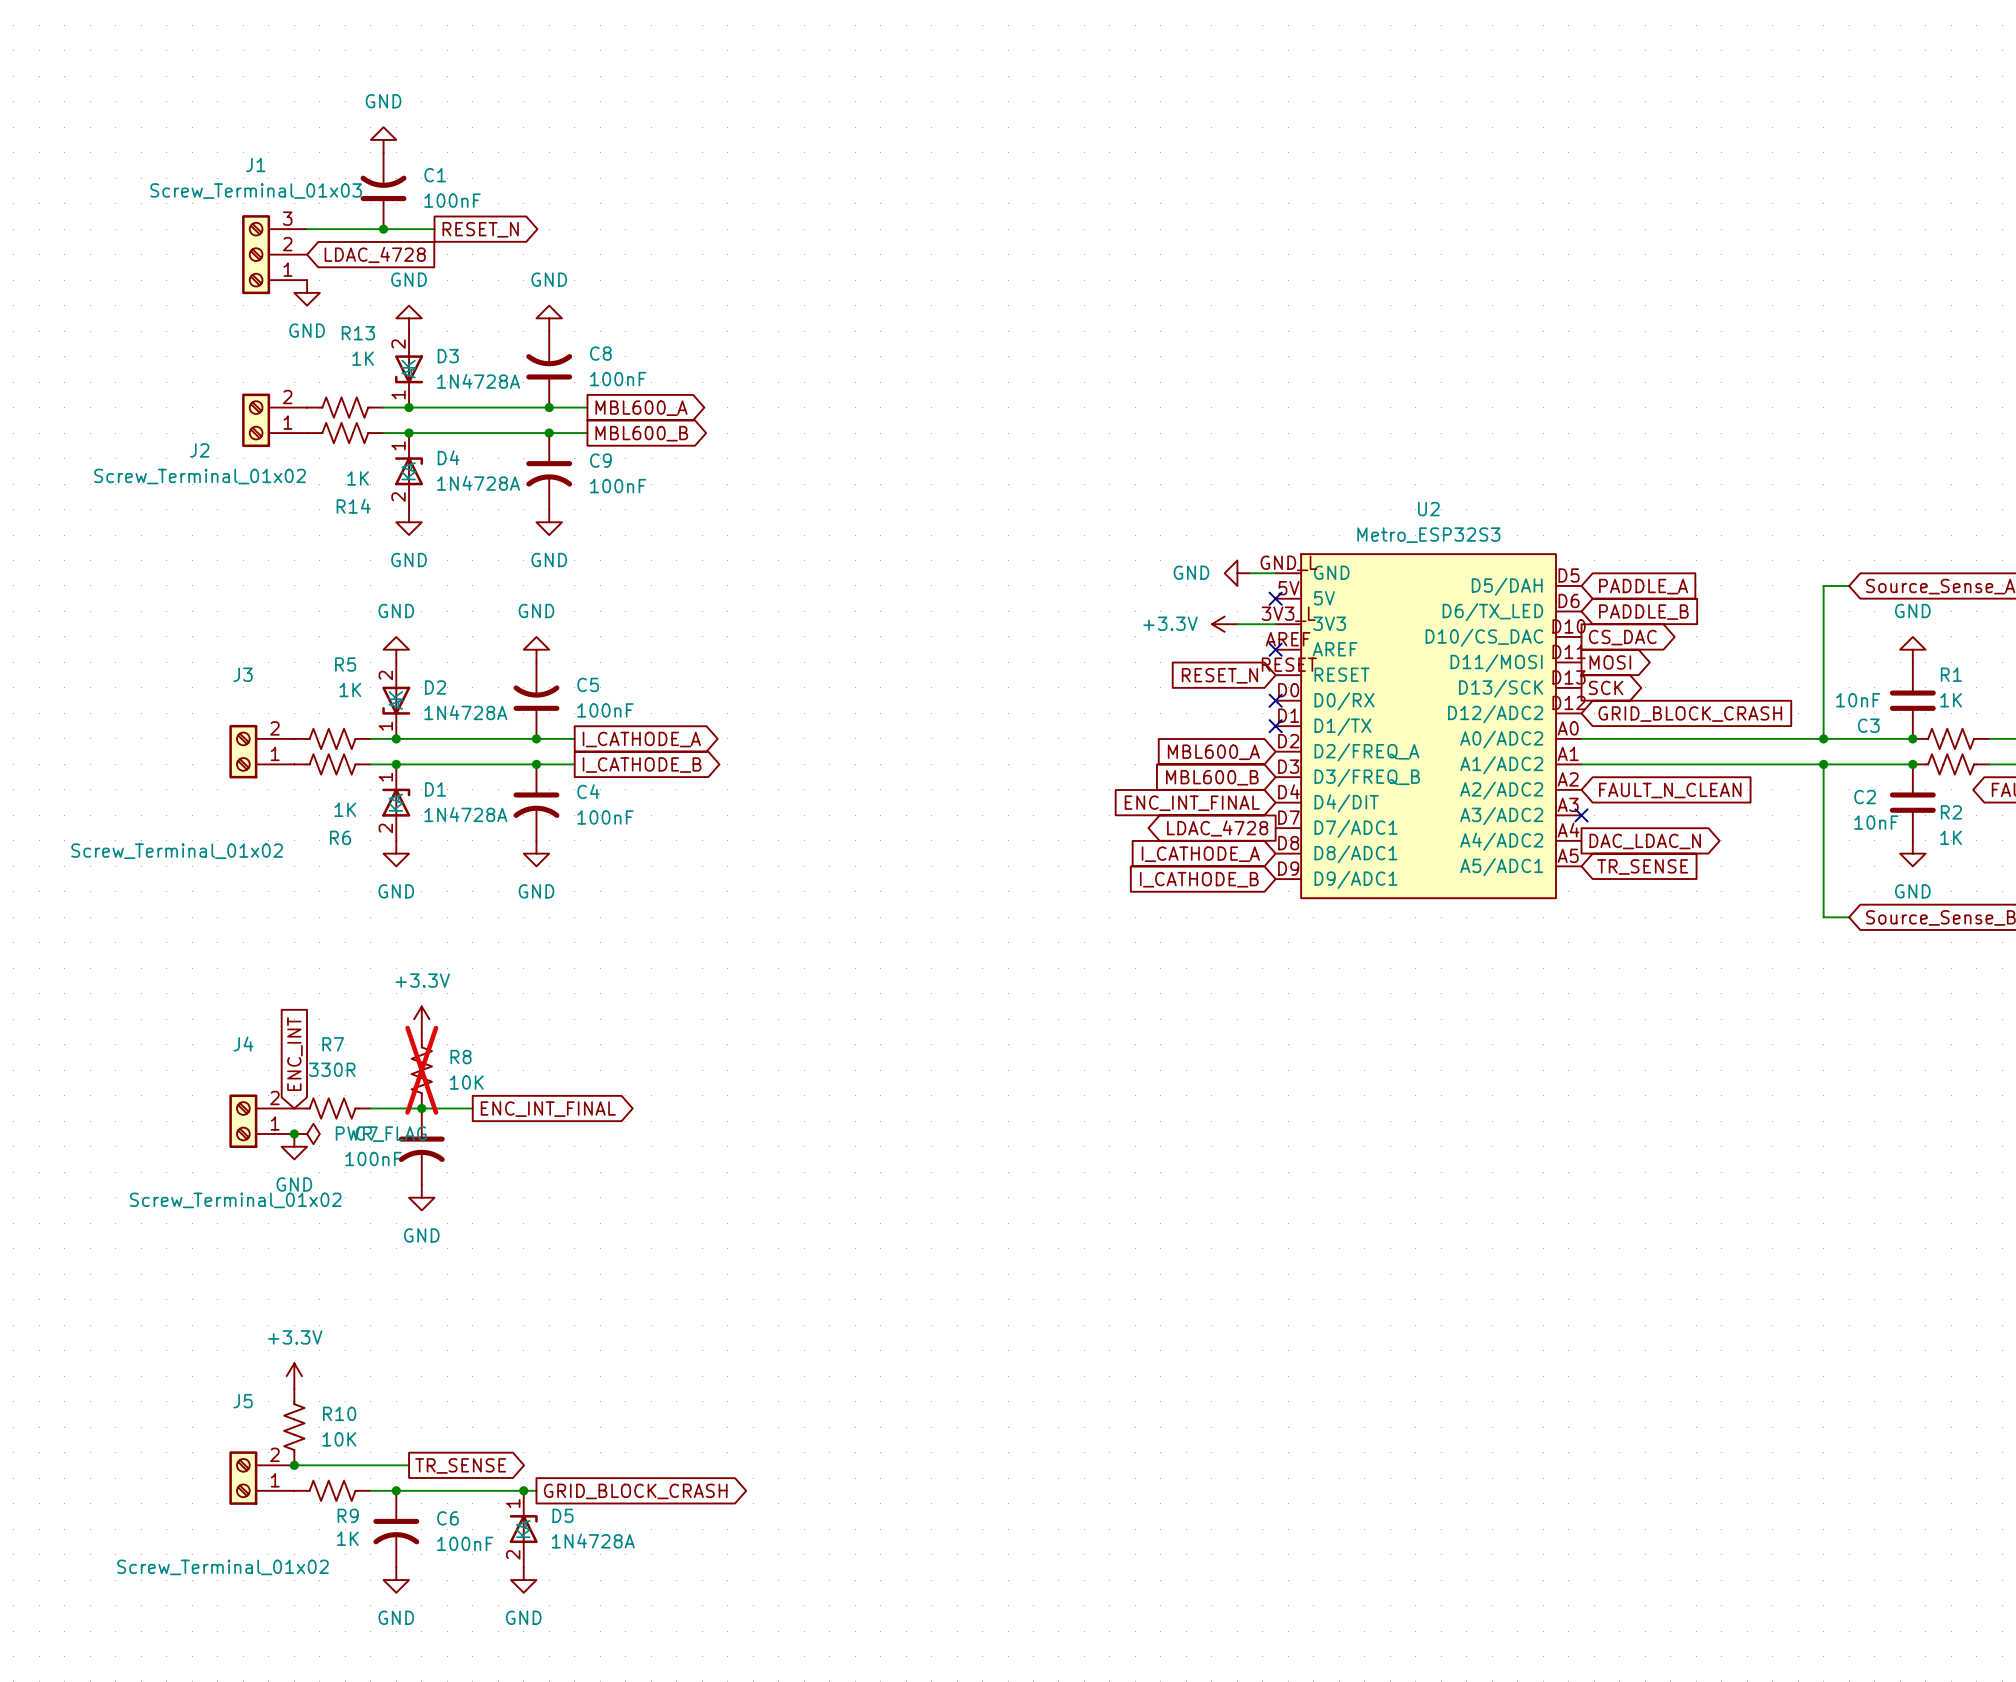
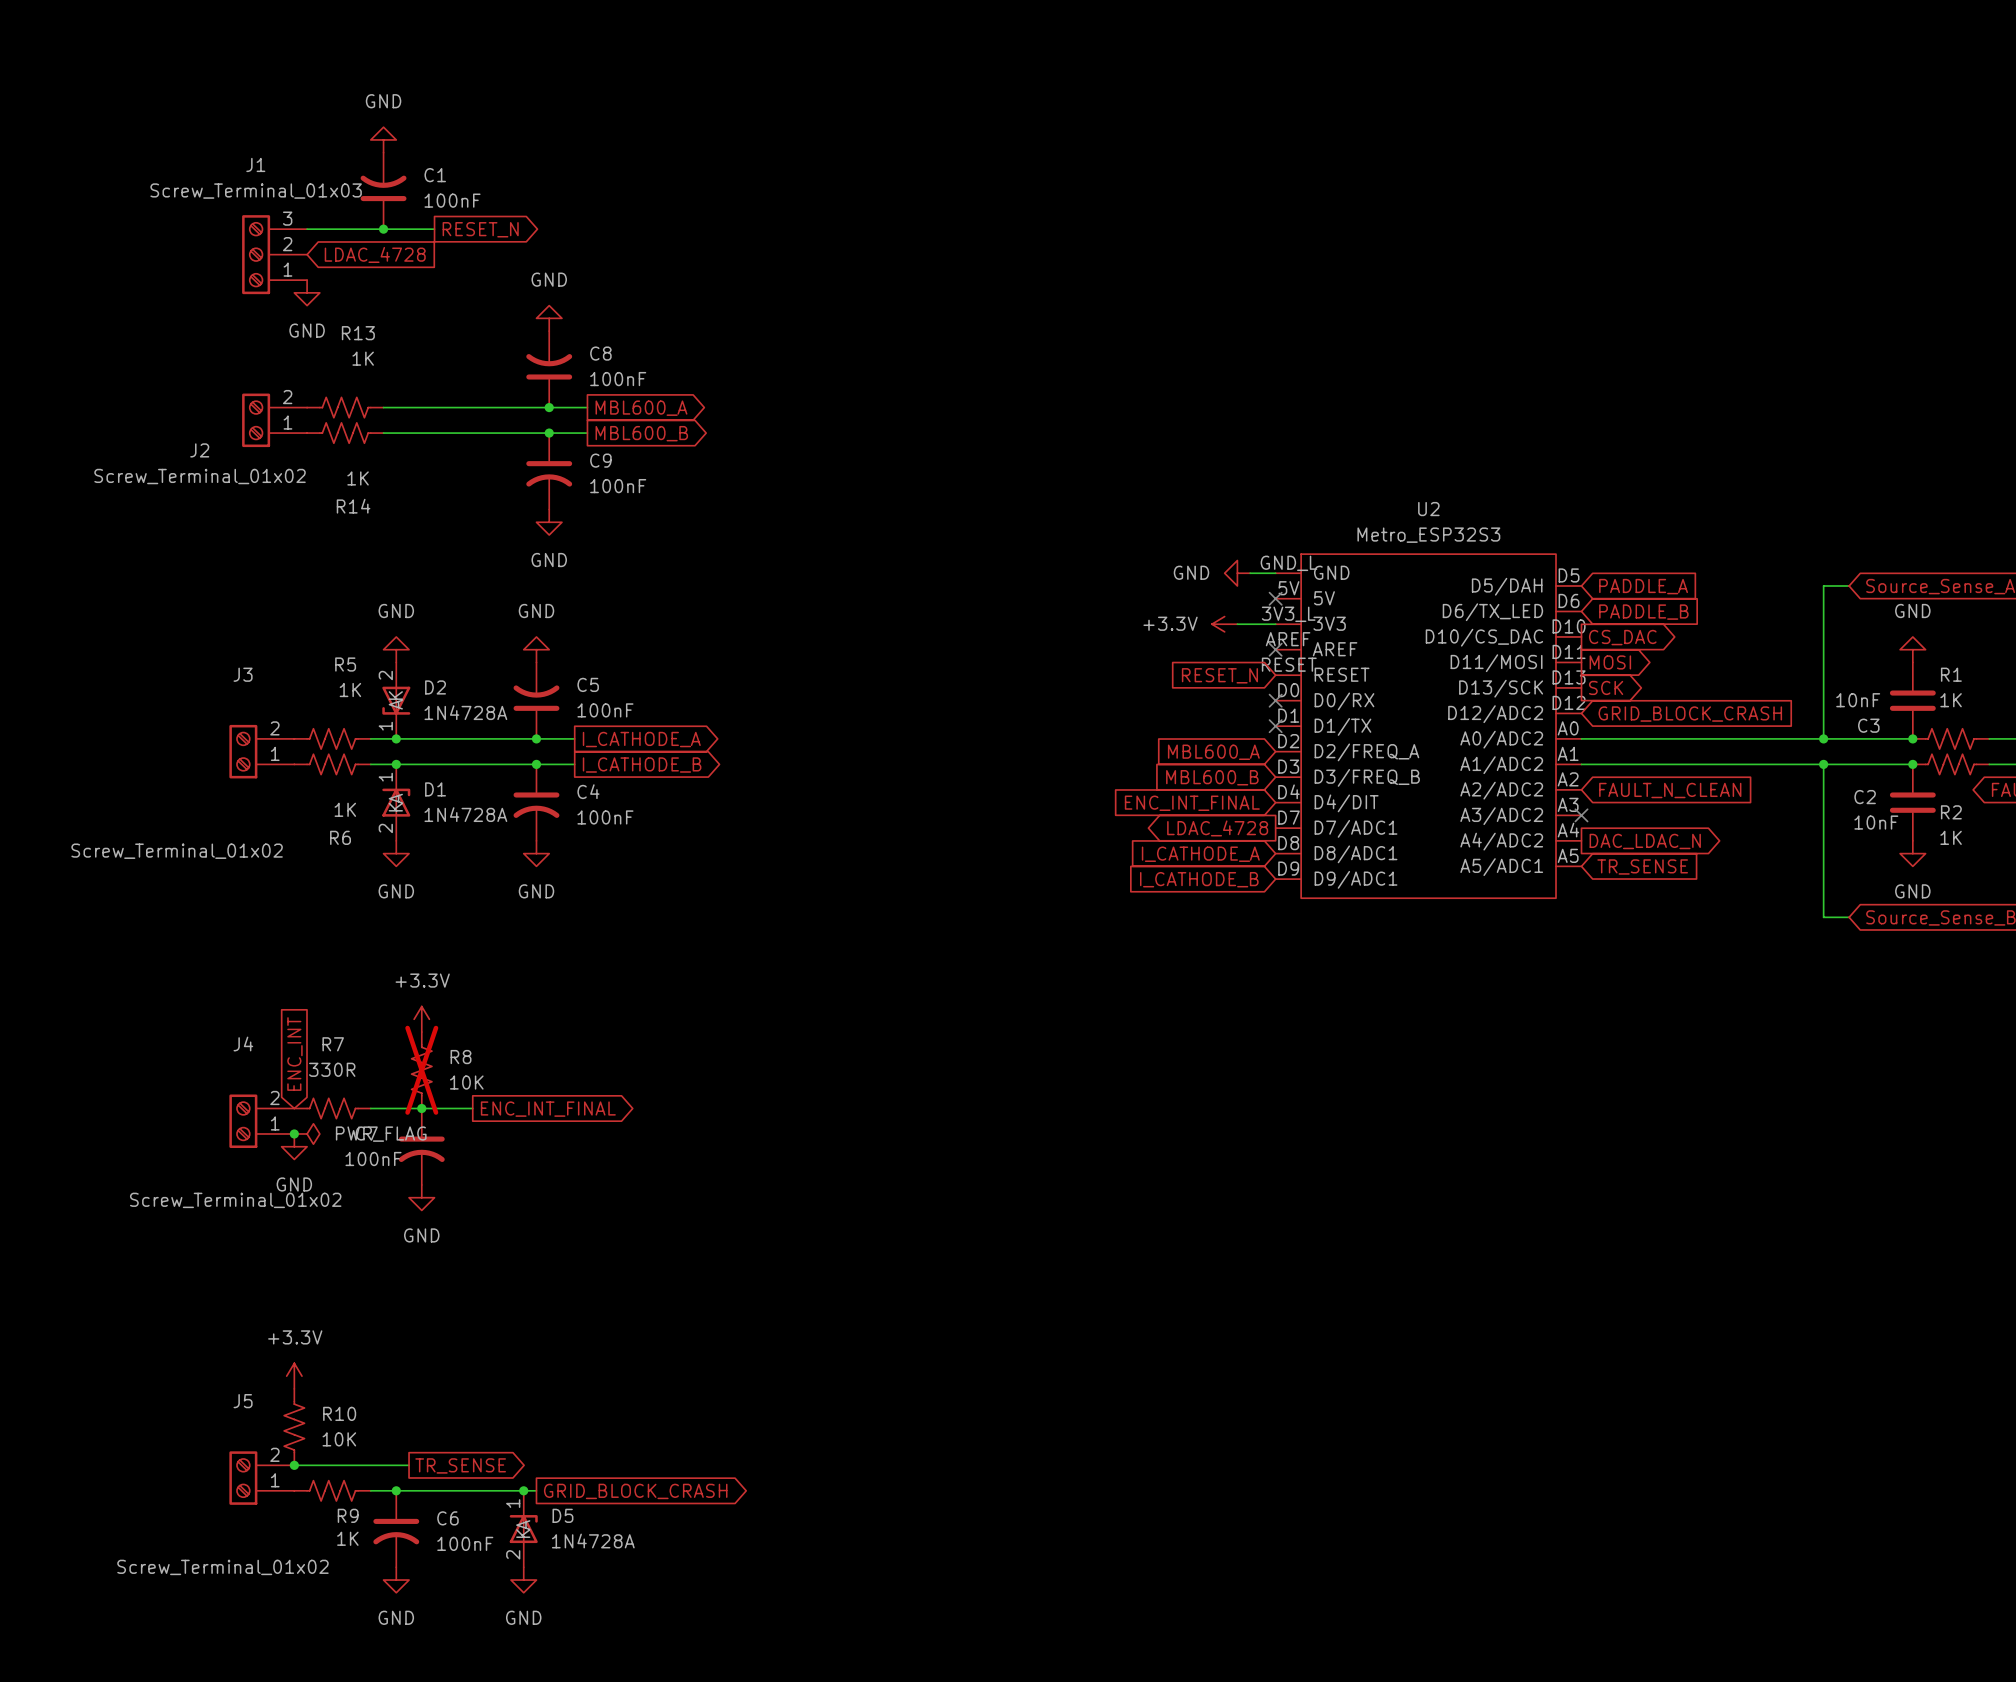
power symbol: GND (409, 318) -> none
D3: 1N4728A (409, 369) -> none
junction: (409, 407) -> none
junction: (409, 433) -> none
D4: 1N4728A (409, 471) -> none
power symbol: GND (409, 522) -> none

